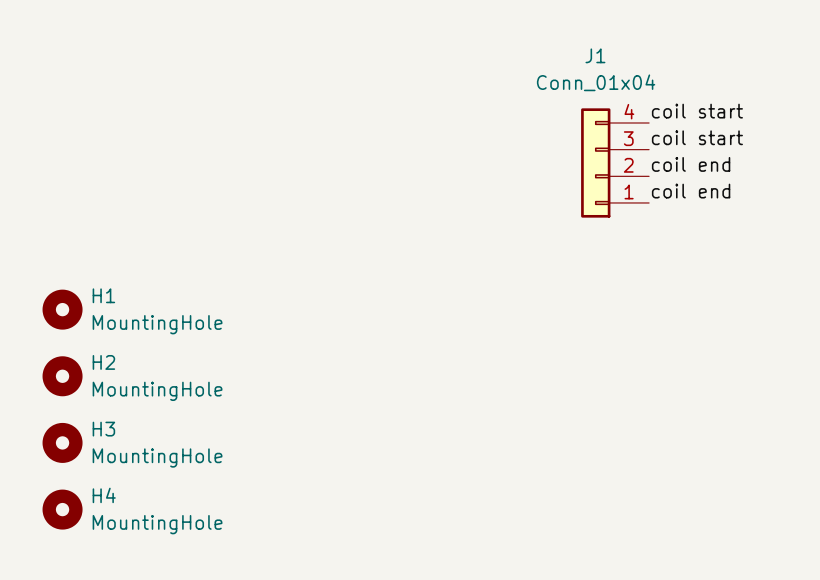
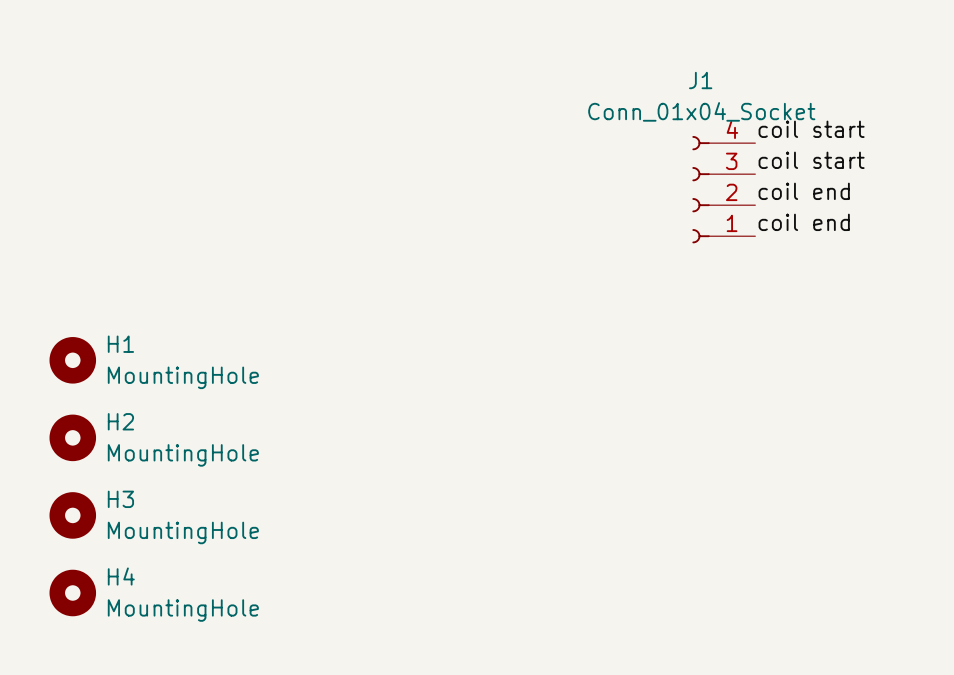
J1 value: Conn_01x04 (596, 82) -> Conn_01x04_Socket (701, 111)
J1 symbol: [581, 108, 650, 218] -> [692, 135, 756, 244]

